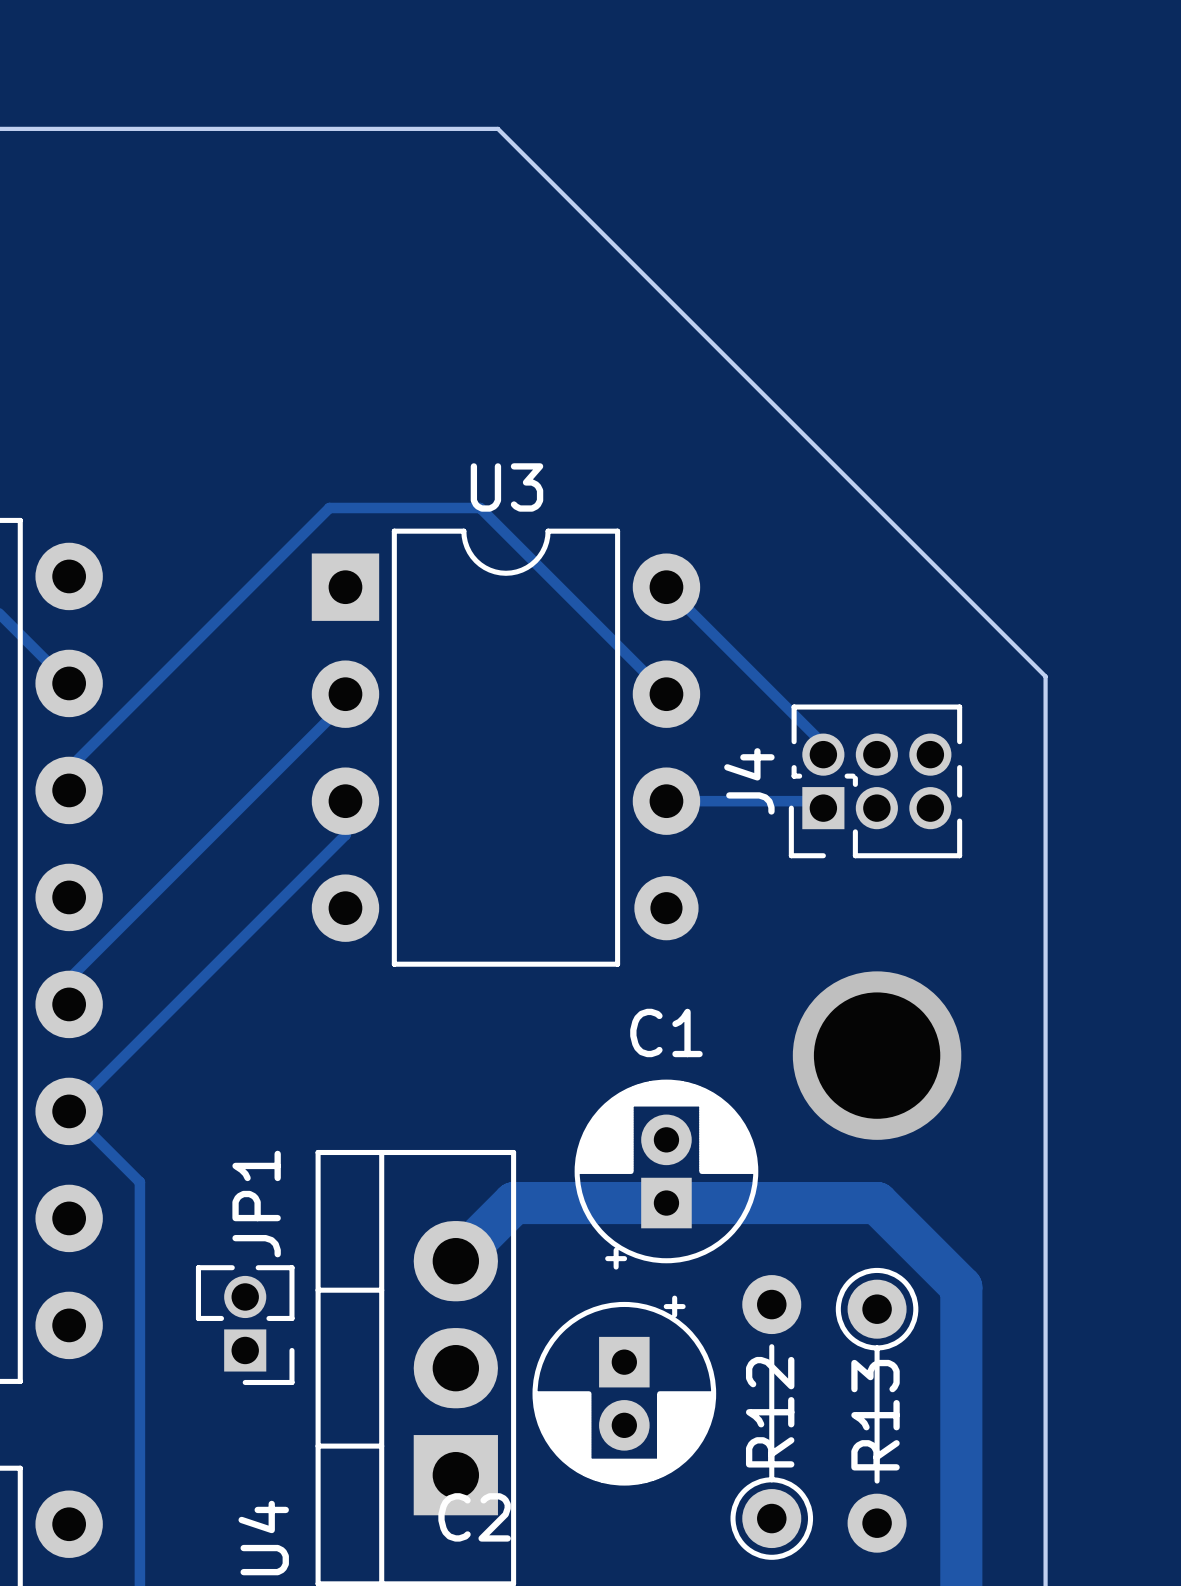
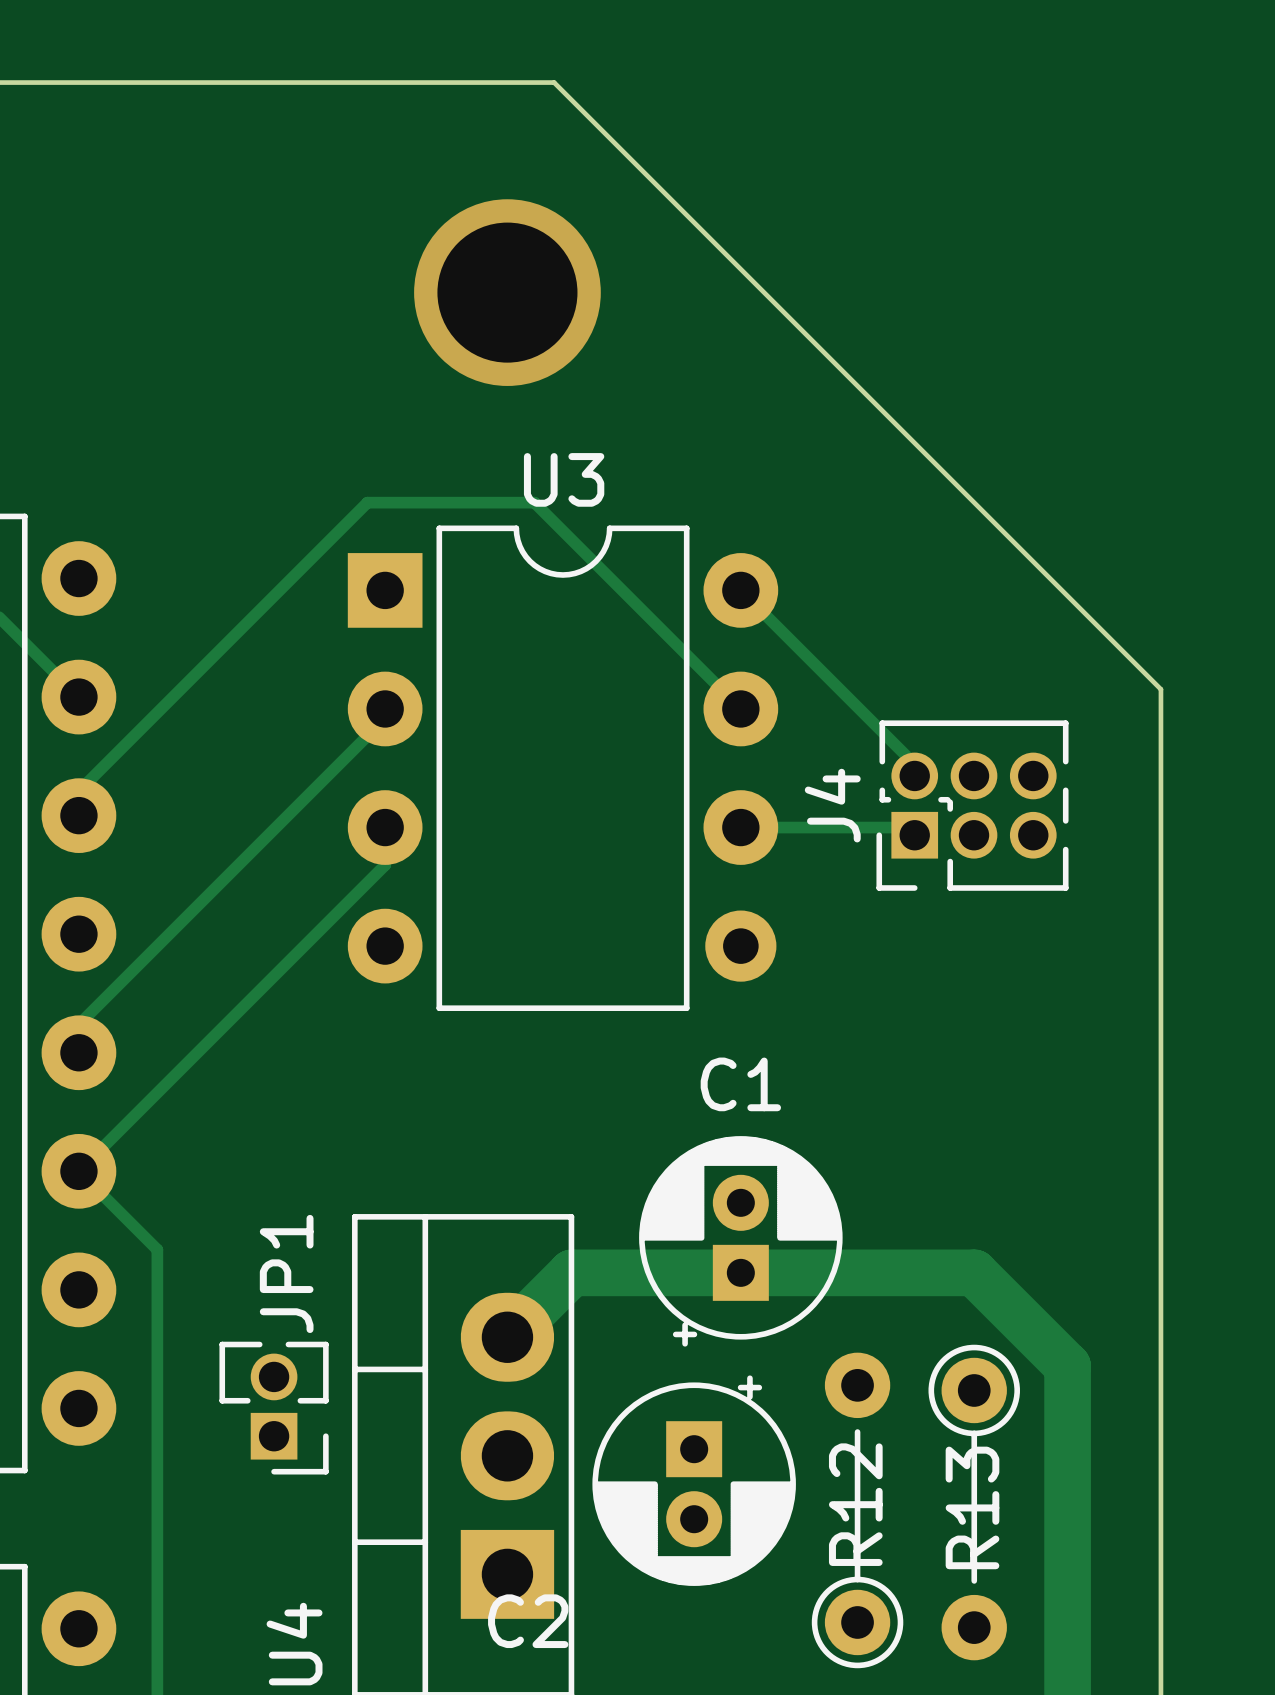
via: none -> (507, 292)
via: (877, 1055) -> none

